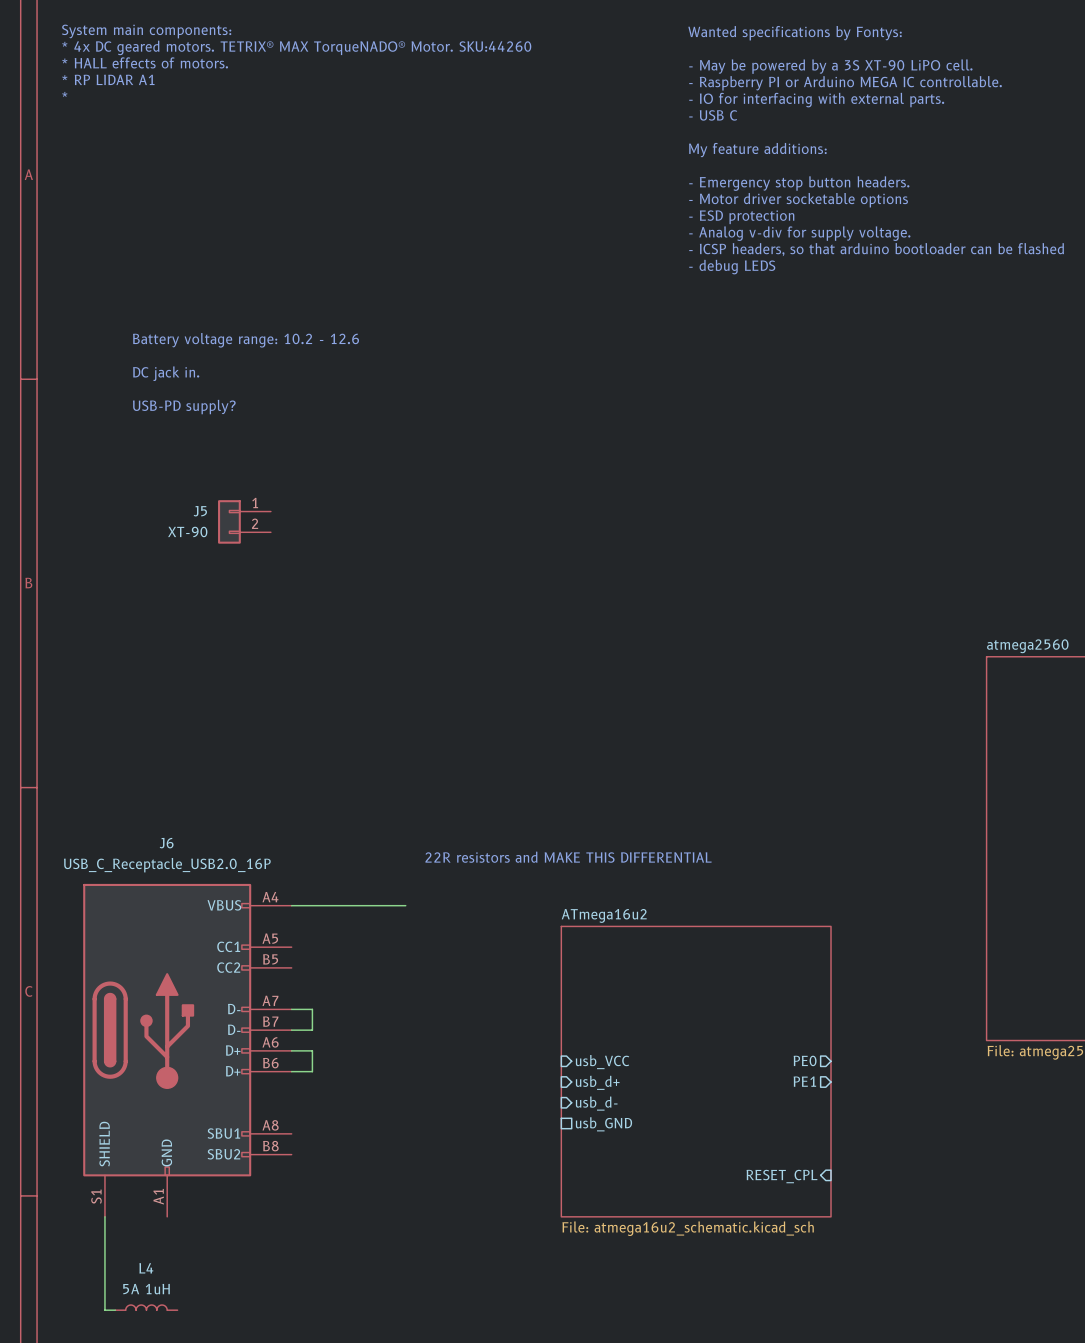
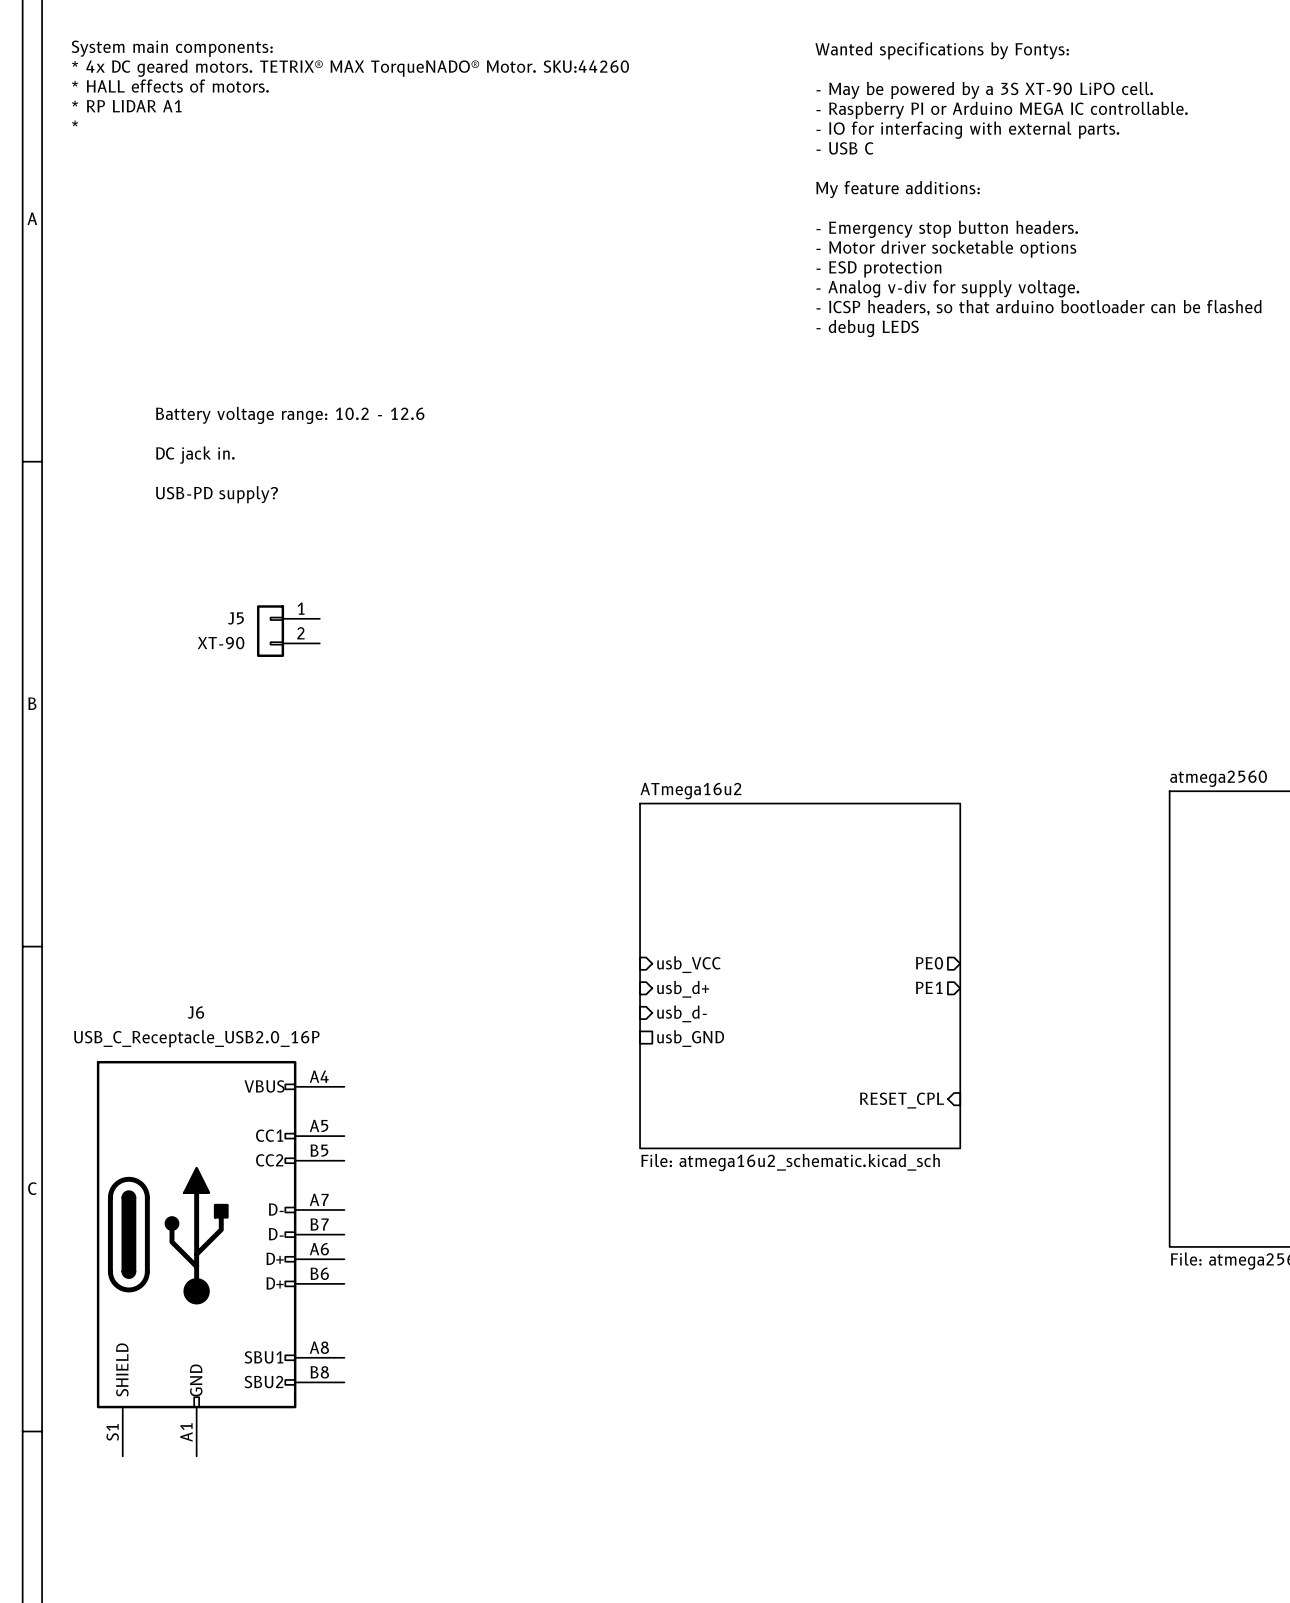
sheet pin: none -> PE0 (929, 963)
sheet pin: none -> usb_VCC (688, 964)
sheet pin: none -> PE1 (929, 987)
sheet pin: none -> usb_d+ (683, 989)
sheet pin: none -> usb_d- (682, 1013)
text: 22R resistors and MAKE THIS DIFFERENTIAL (568, 857) -> none
sheet pin: none -> usb_GND (690, 1038)
wire: (291, 905) (405, 905) -> none
sheet pin: none -> RESET_CPL (902, 1100)
wire: (291, 1009) (312, 1009) (312, 1030) (291, 1030) -> none
wire: (291, 1050) (312, 1050) (312, 1071) (291, 1071) -> none
sheet pin: PE0 (805, 1060) -> none
sheet pin: usb_VCC (602, 1062) -> none
sheet ATmega16u2 position: (696, 1071) -> (800, 975)
sheet pin: PE1 (804, 1081) -> none
sheet pin: usb_d+ (597, 1082) -> none
sheet pin: usb_d- (596, 1103) -> none
sheet pin: usb_GND (603, 1124) -> none
sheet pin: RESET_CPL (781, 1176) -> none
wire: (104, 1216) (104, 1310) (115, 1310) -> none
L4: 5A 1uH (146, 1307) -> none

